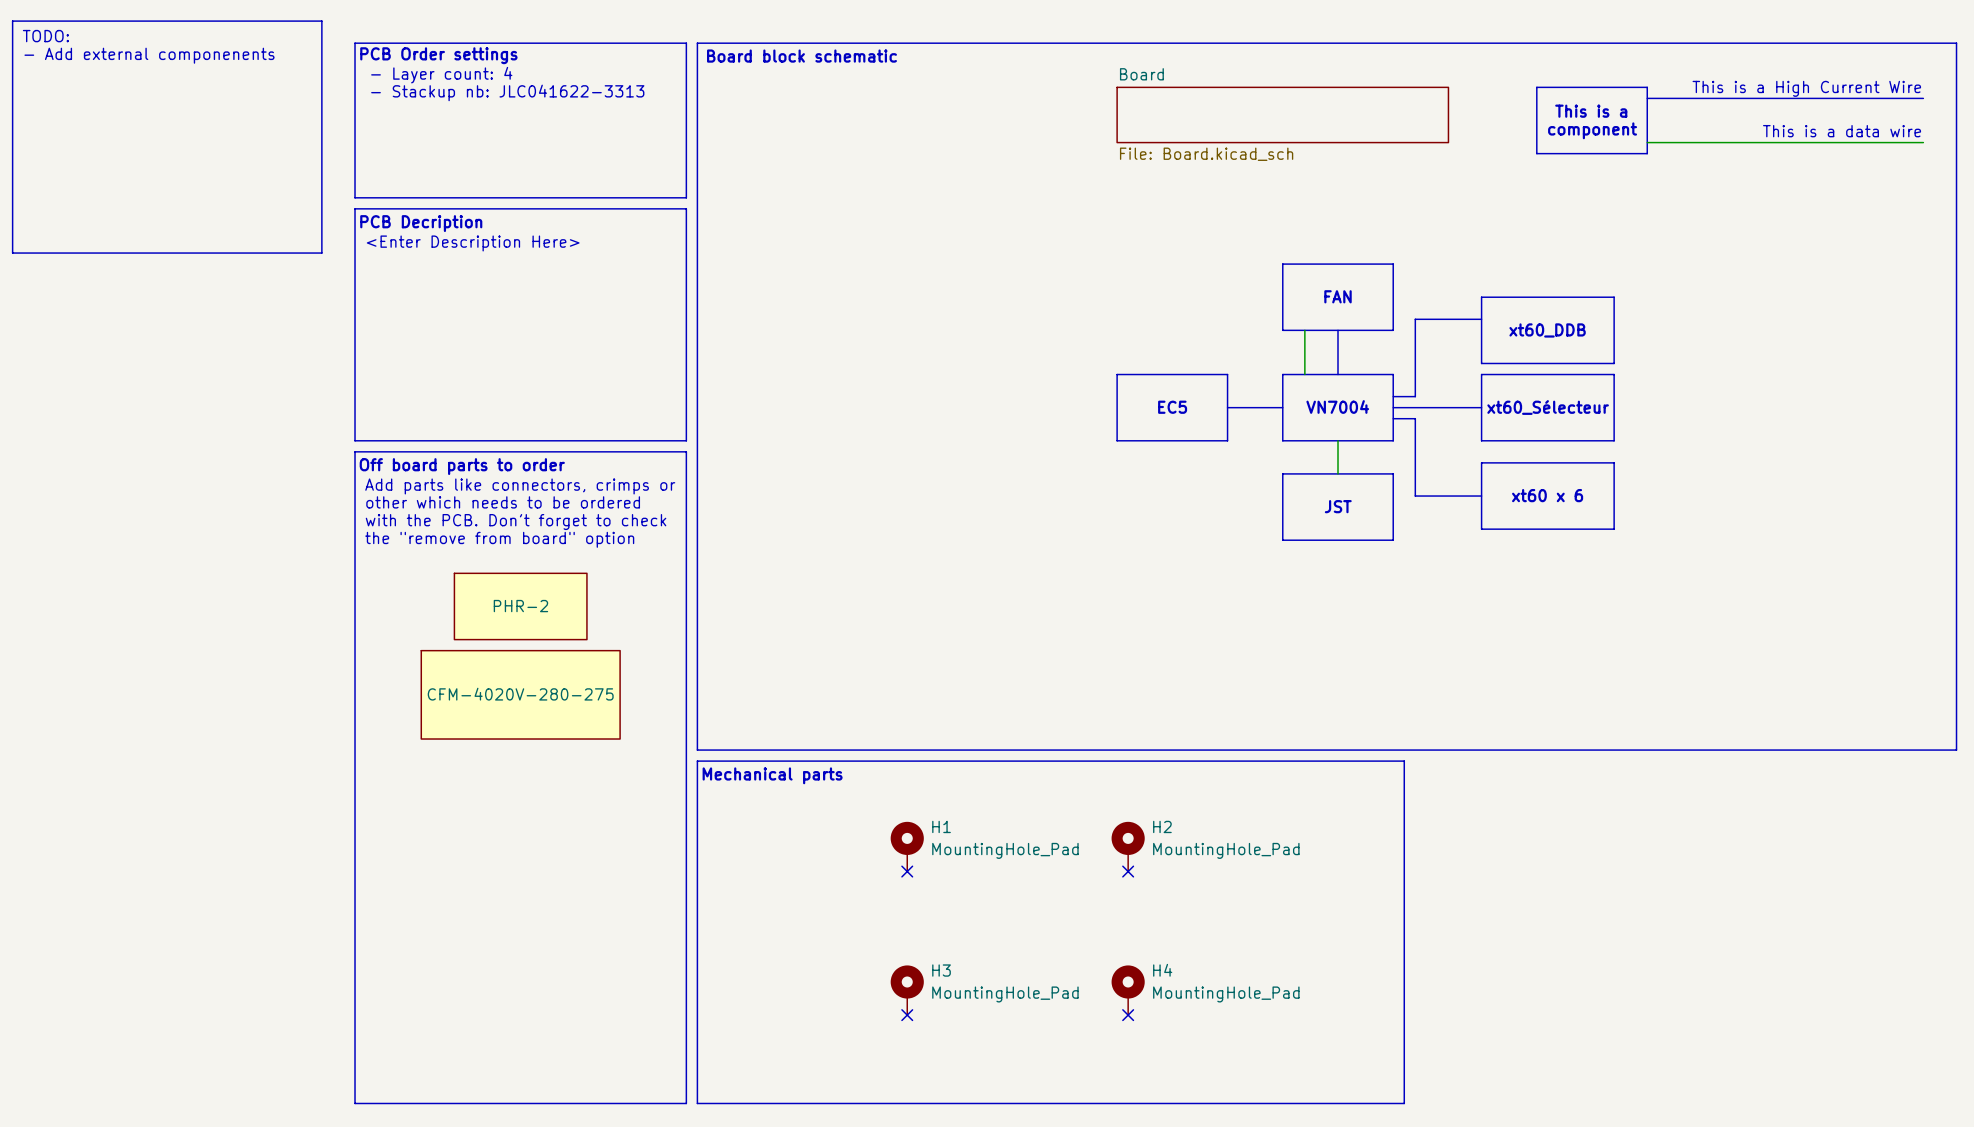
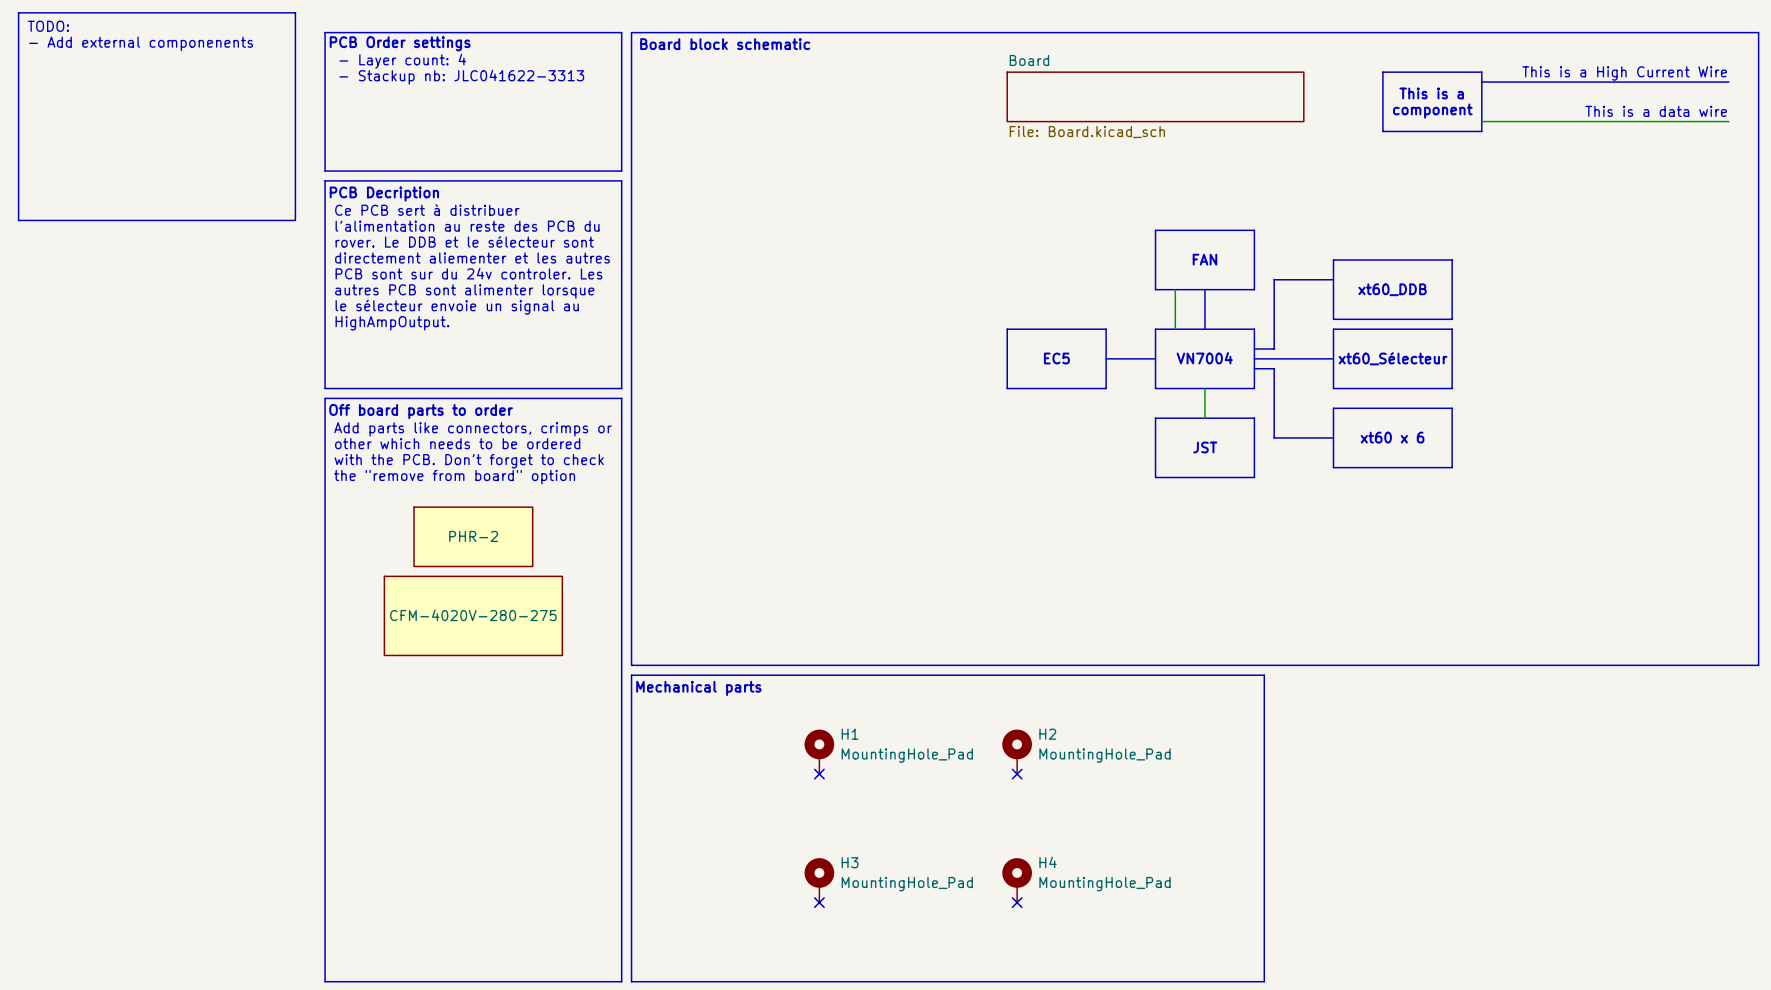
text: <Enter Description Here> (473, 243) -> Ce PCB sert à distribuer (427, 210)
text: none -> l'alimentation au reste des PCB du (467, 226)
text: none -> rover. Le DDB et le sélecteur sont (464, 241)
text: none -> directement aliementer et les autres (472, 258)
text: none -> PCB sont sur du 24v controler. Les (468, 273)
text: none -> autres PCB sont alimenter lorsque (464, 291)
text: none -> le sélecteur envoie un signal au (457, 307)
text: none -> HighAmpOutput. (392, 323)

